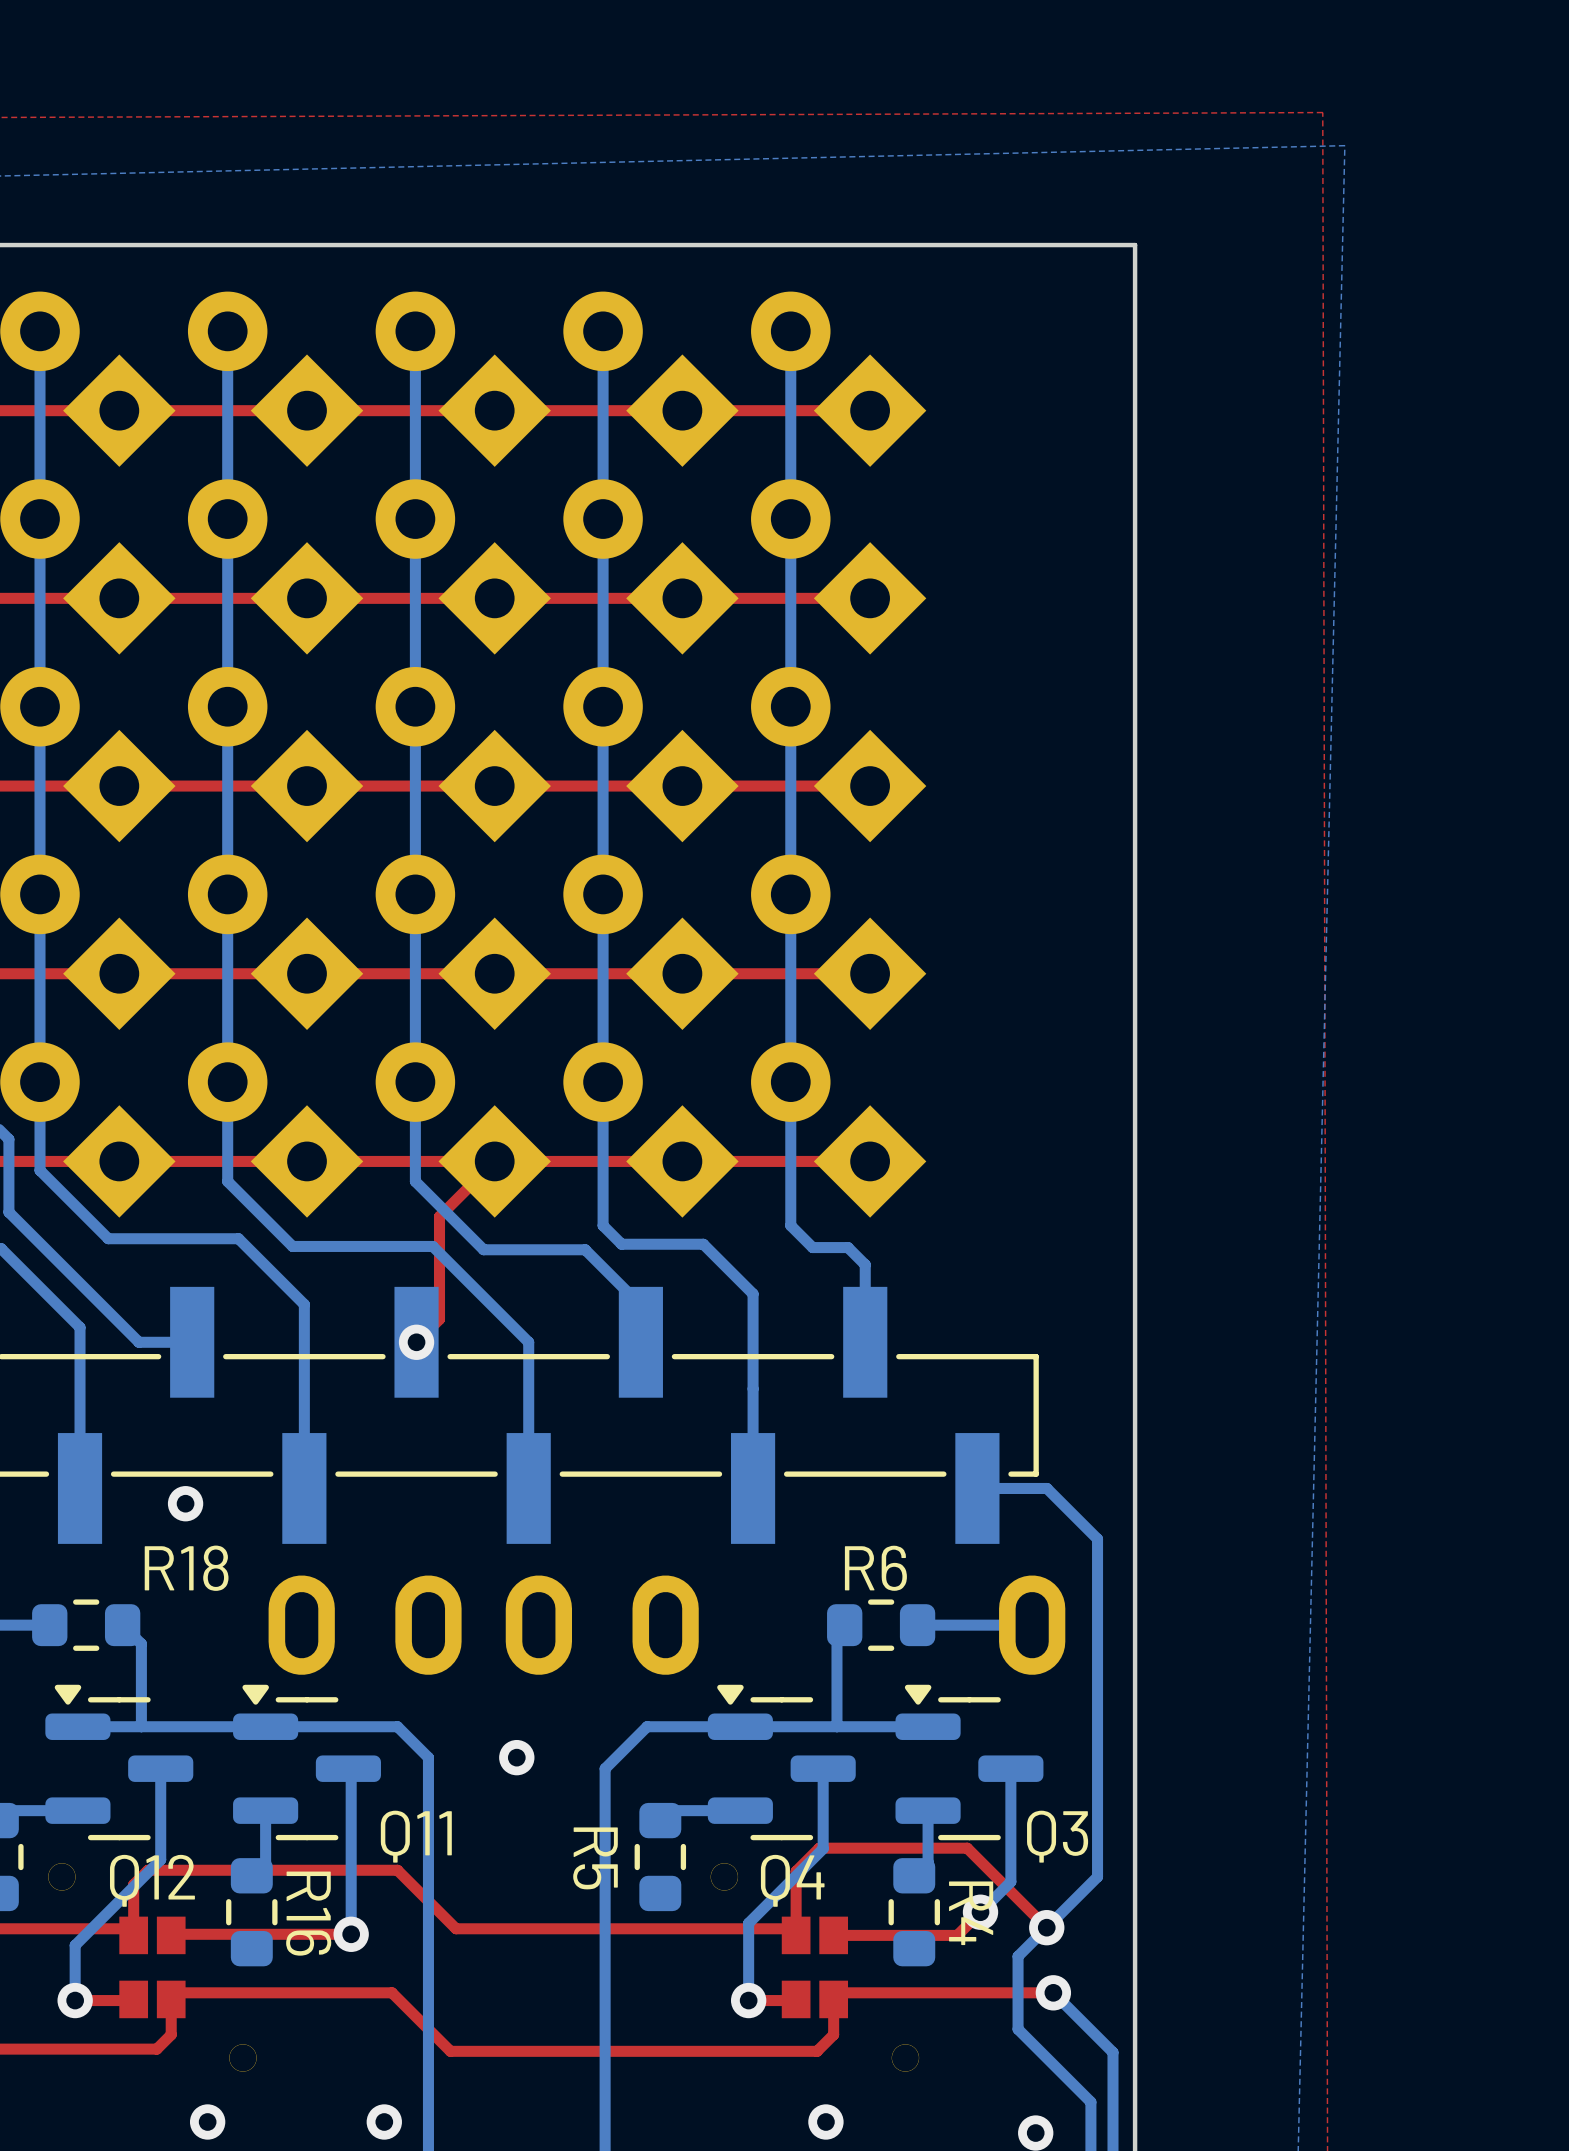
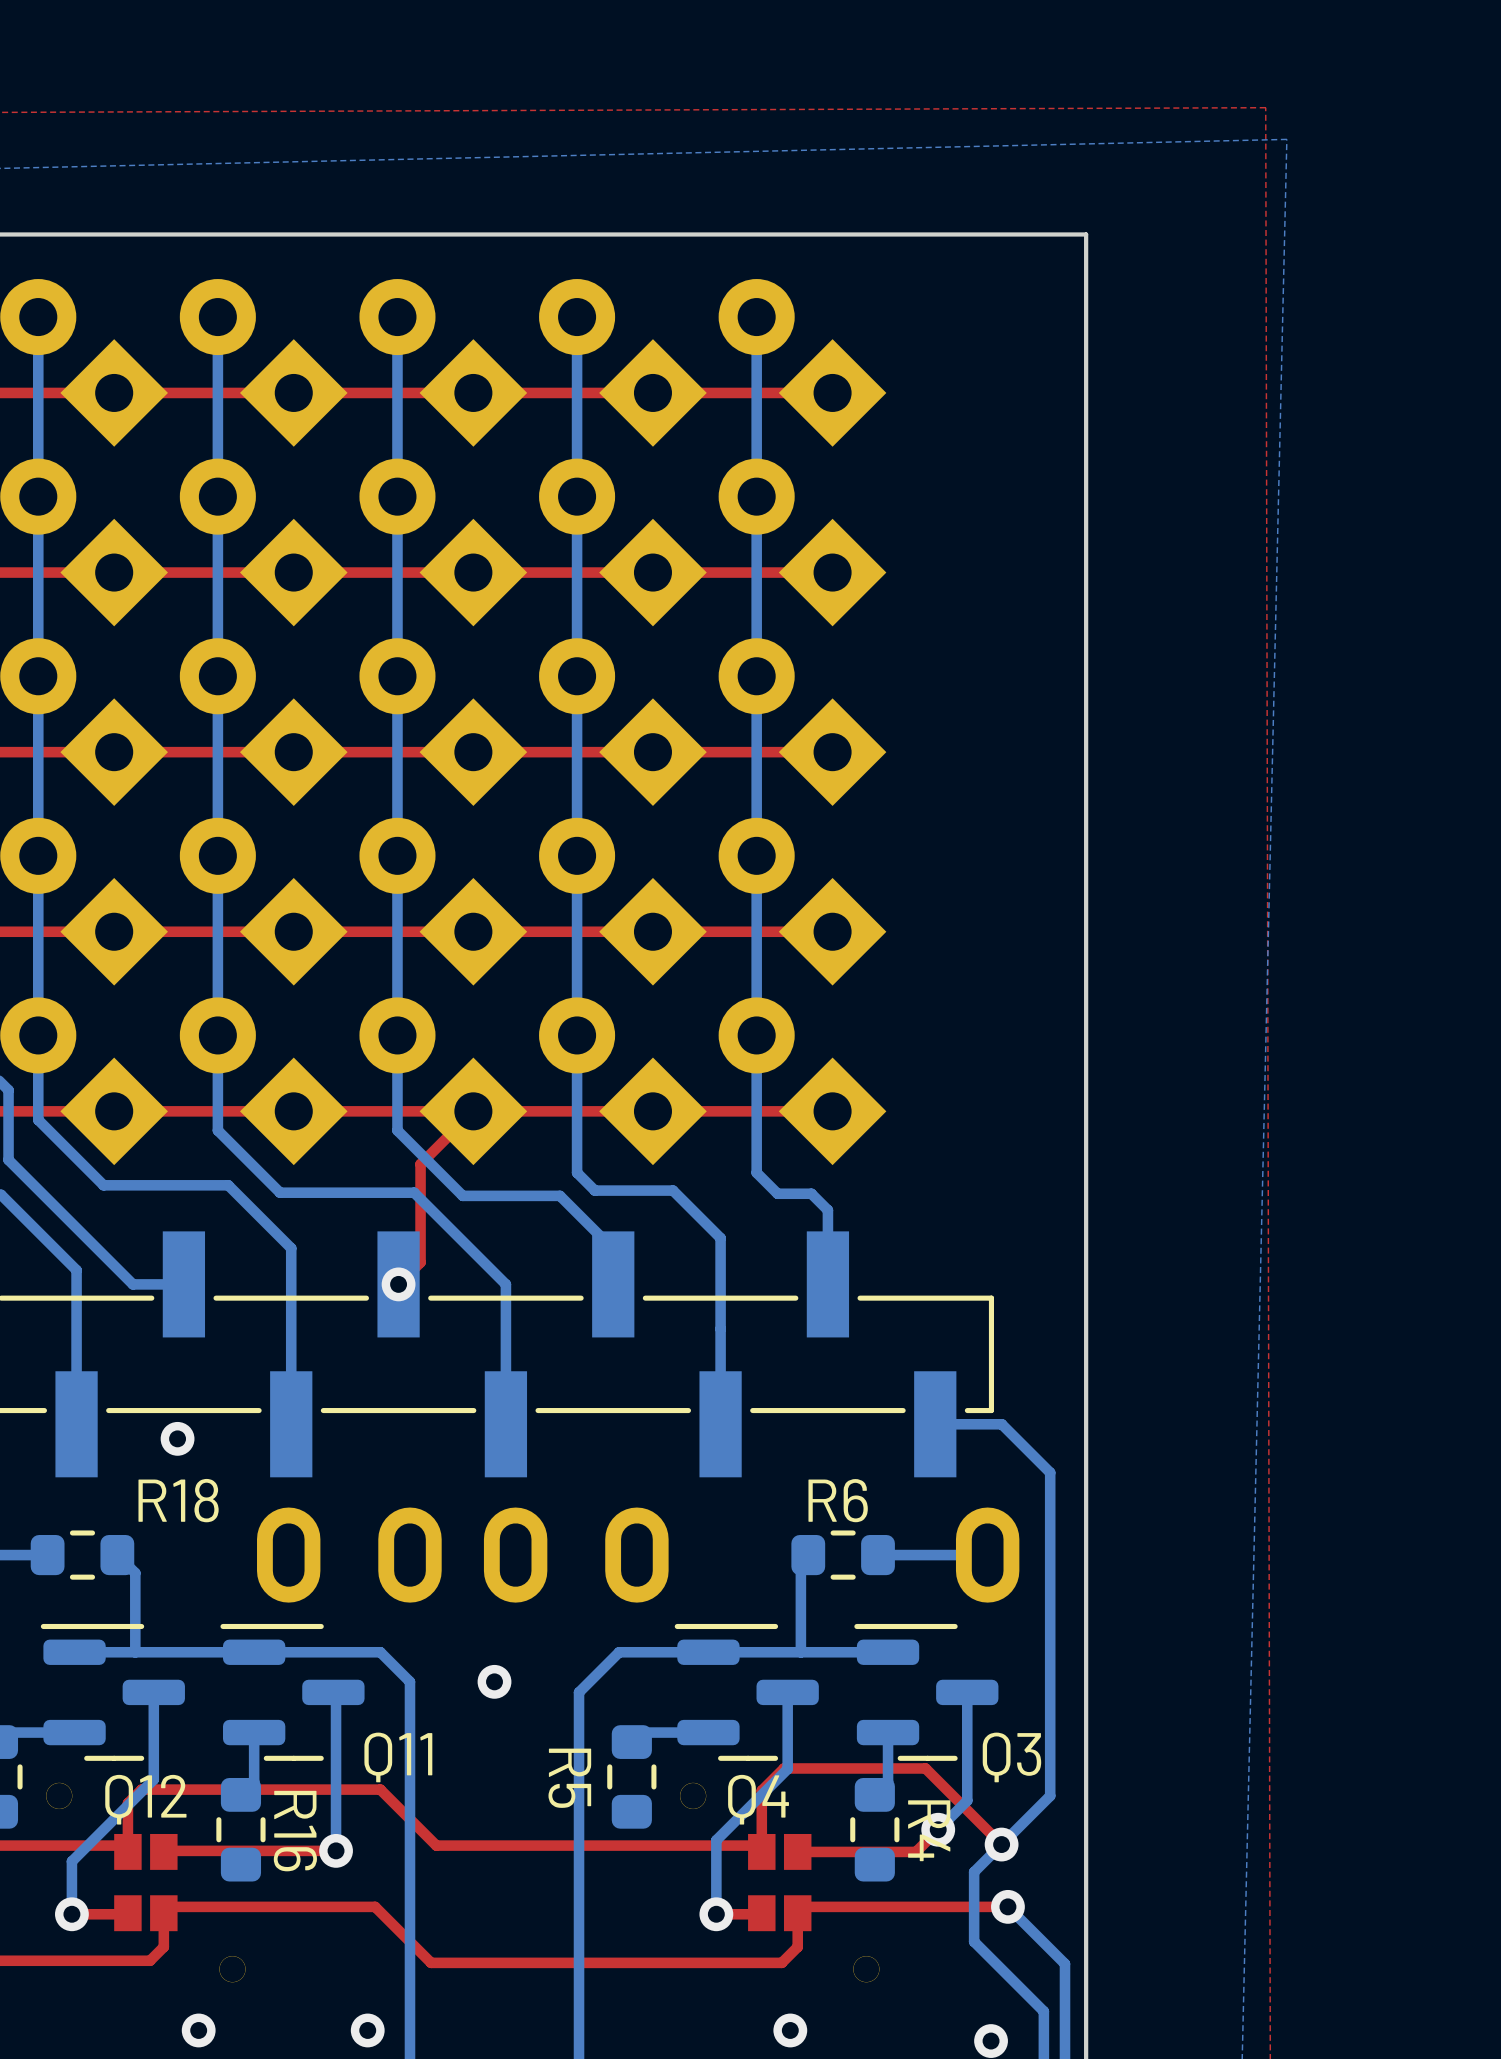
Q12 footprint: [45, 1684, 194, 1841] -> [40, 1623, 185, 1761]
Q11 footprint: [233, 1684, 381, 1841] -> [220, 1623, 365, 1761]
Q4 footprint: [707, 1684, 856, 1841] -> [674, 1623, 819, 1761]
Q3 footprint: [895, 1684, 1044, 1841] -> [854, 1623, 999, 1761]

